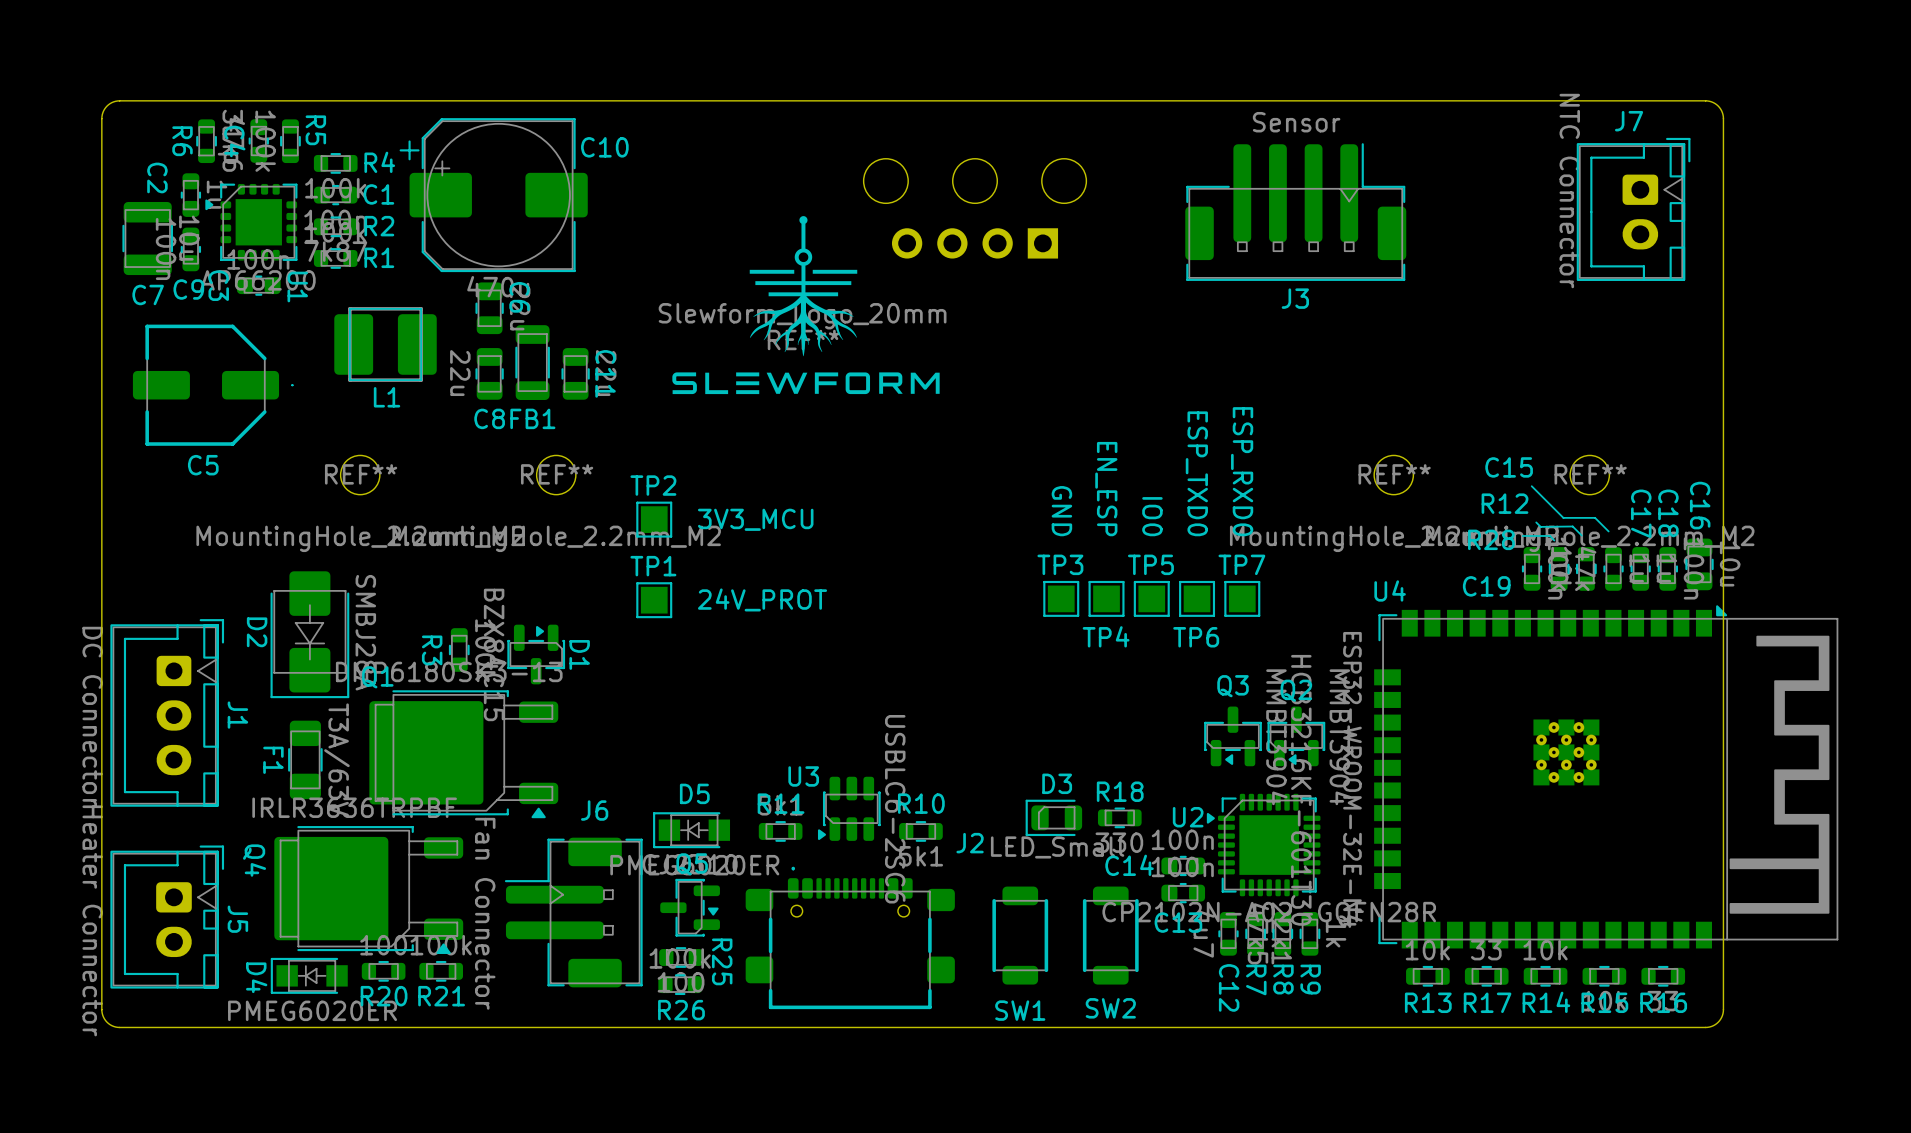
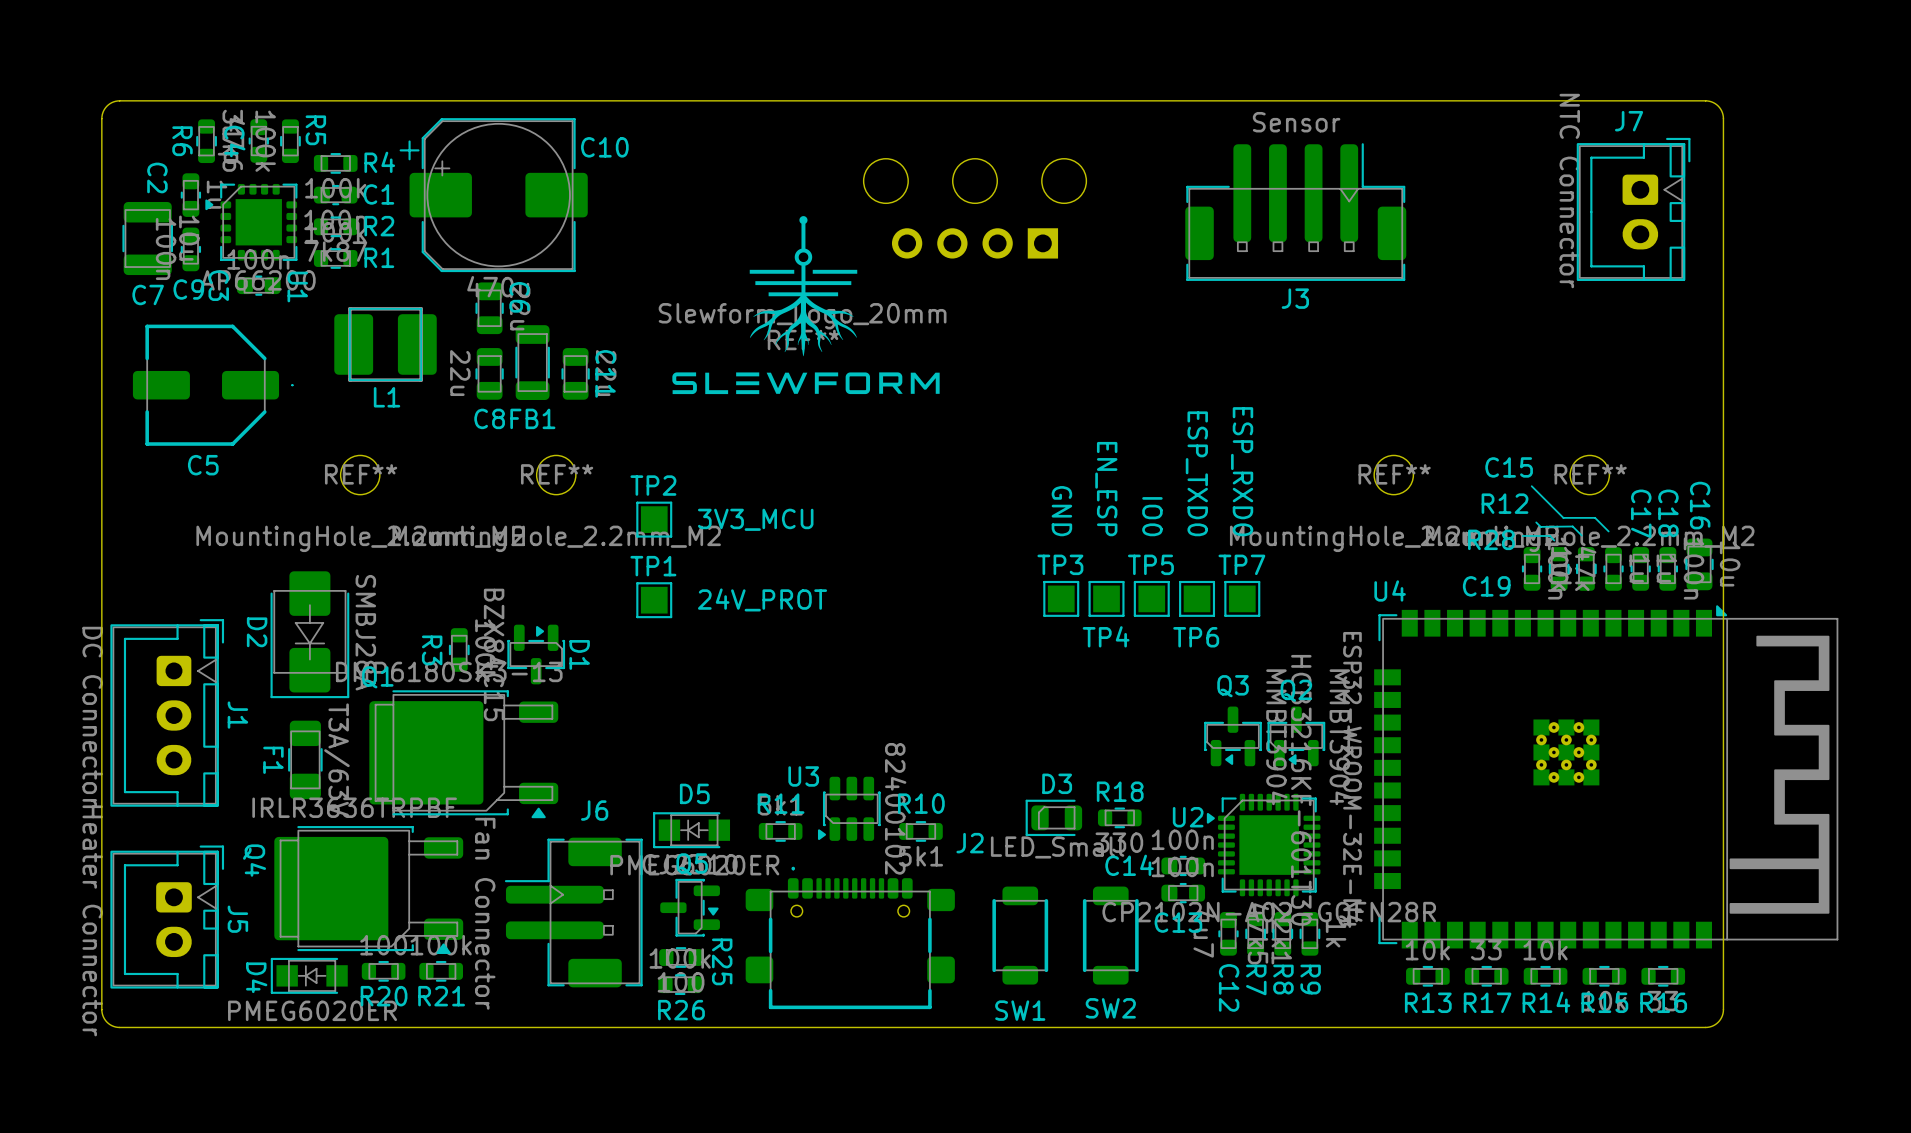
U3 value: USBLC6-2SC6 (895, 809) -> 82400102 (895, 808)

